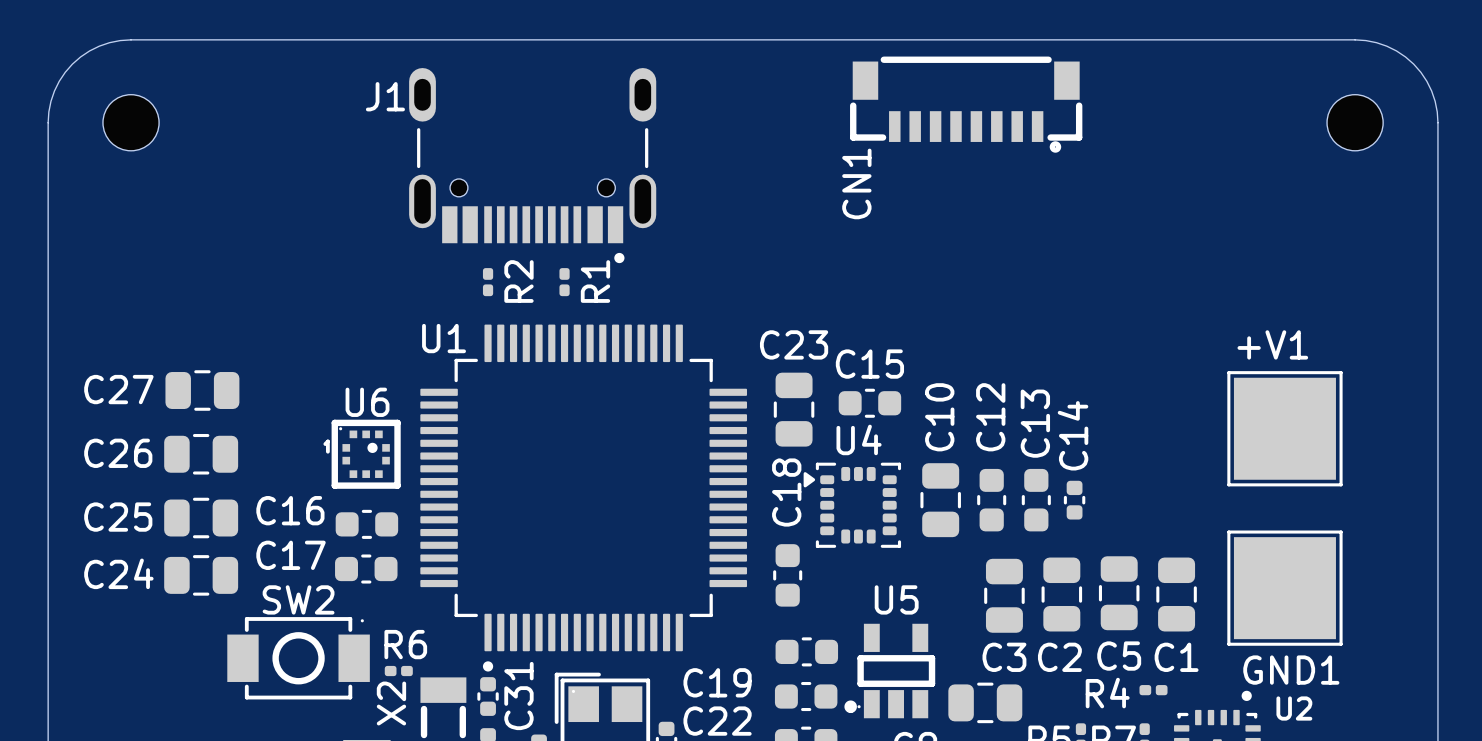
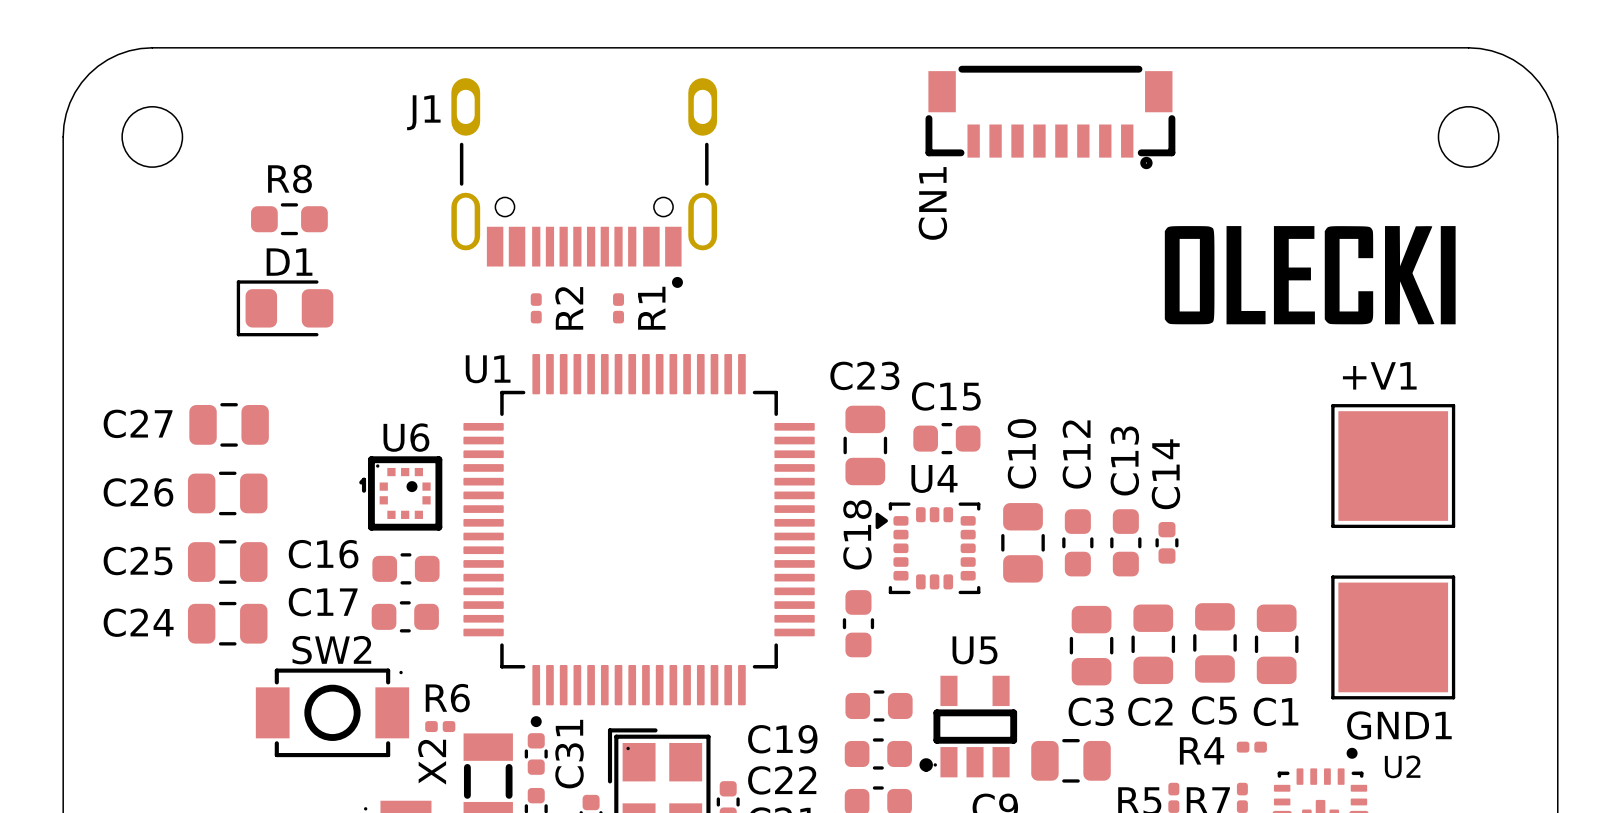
R8: none -> (289, 219)
drawing: none -> [1164, 226, 1456, 325]
D1: none -> (285, 308)

